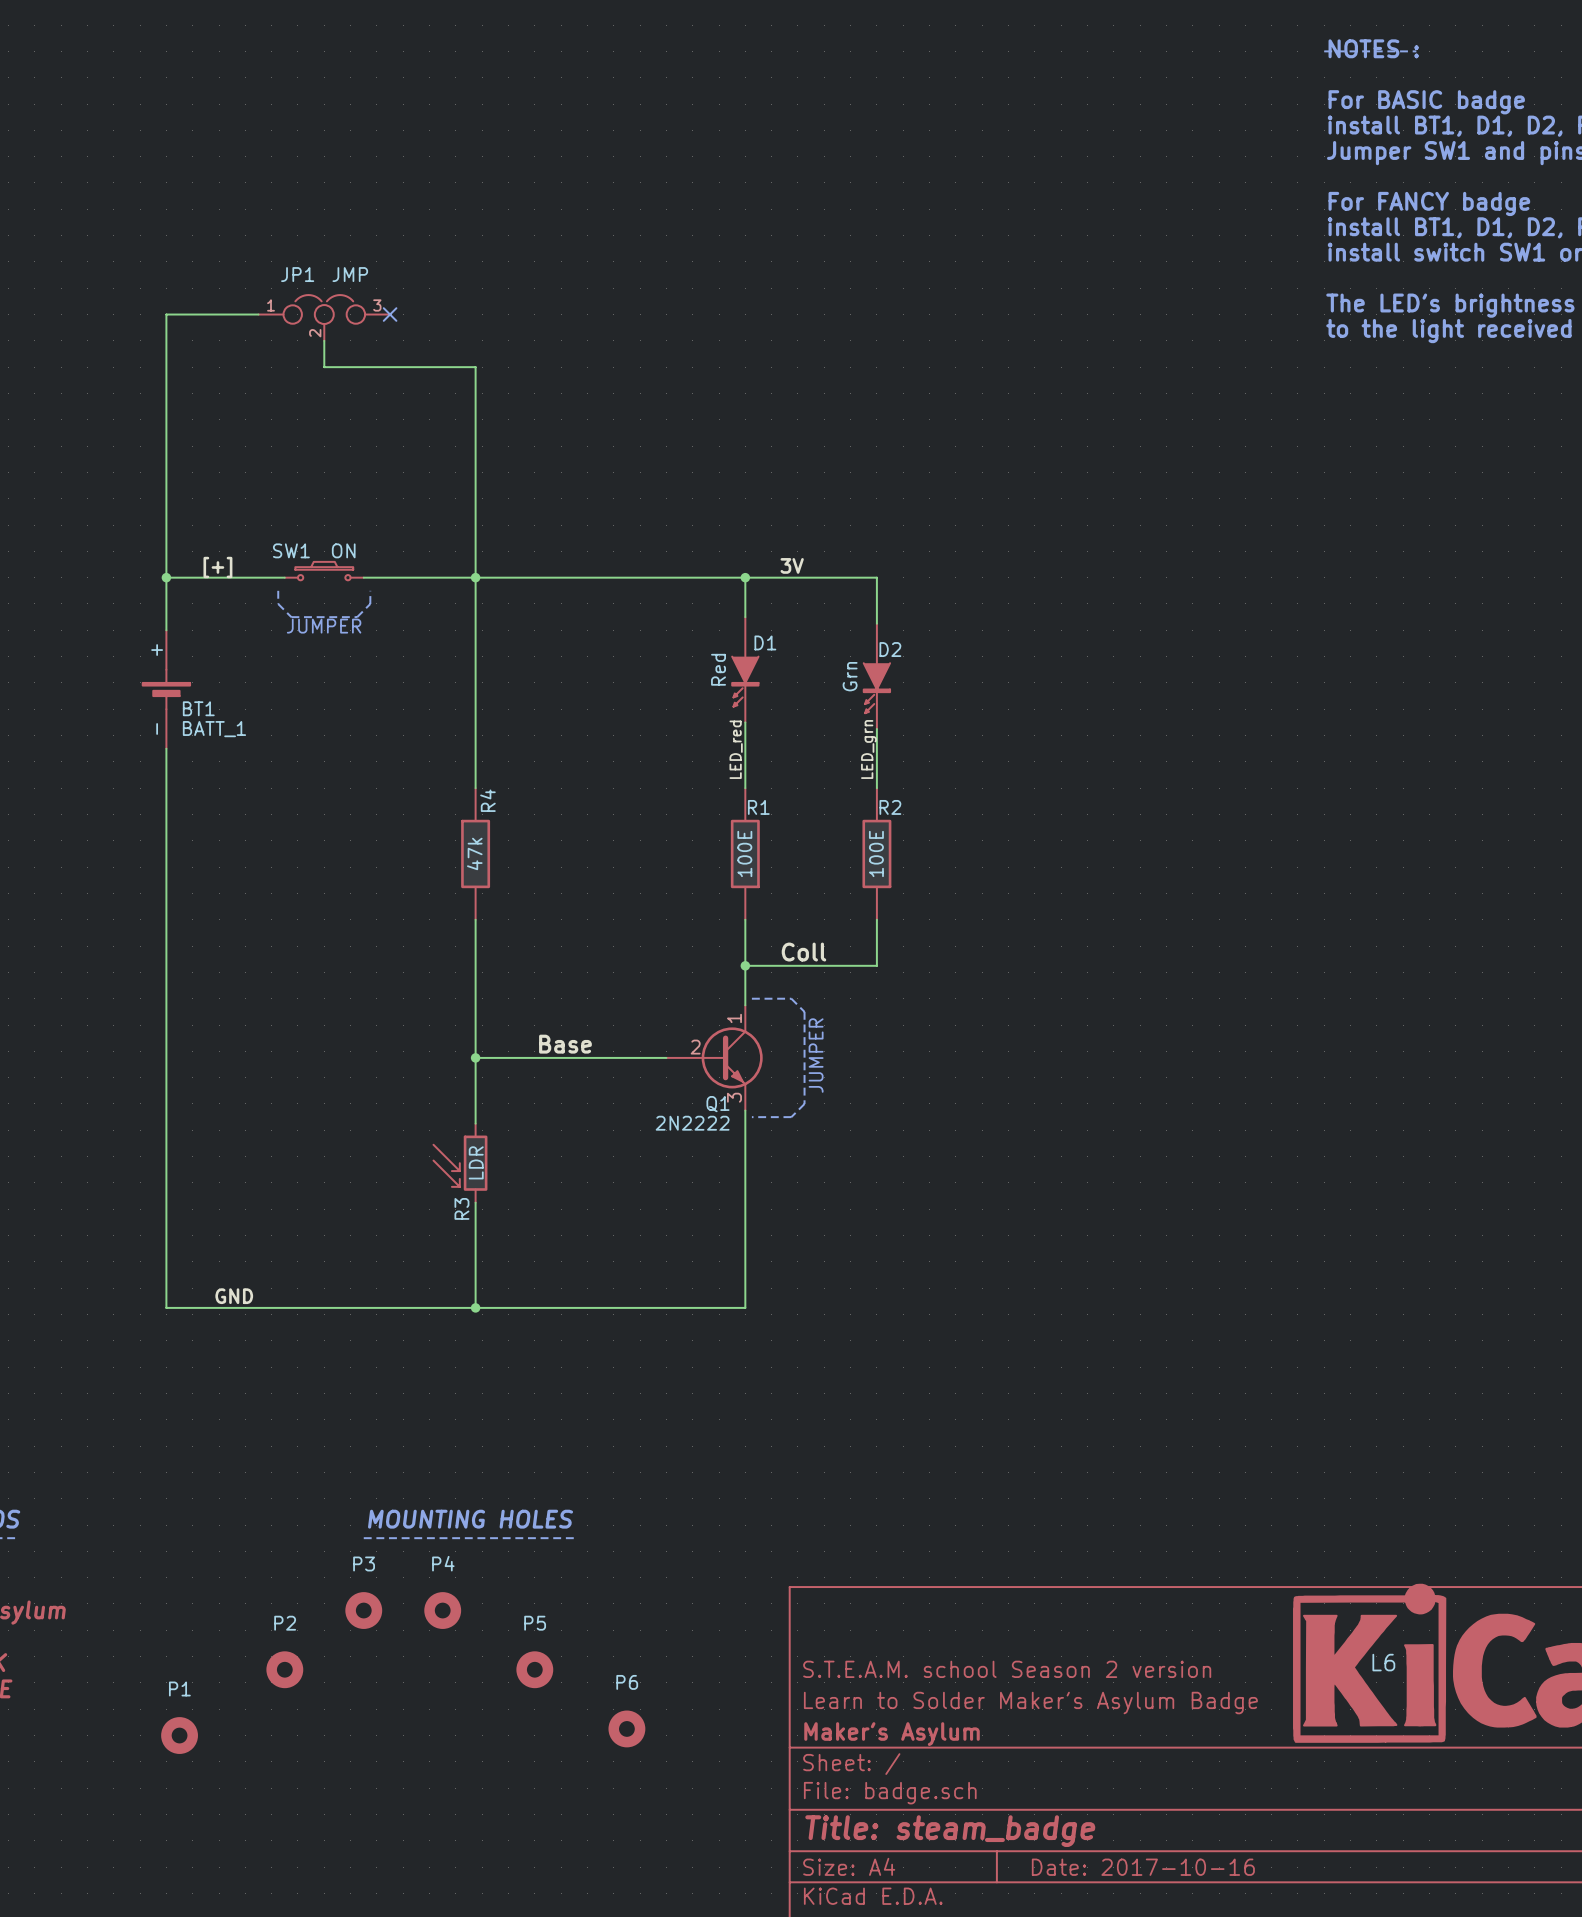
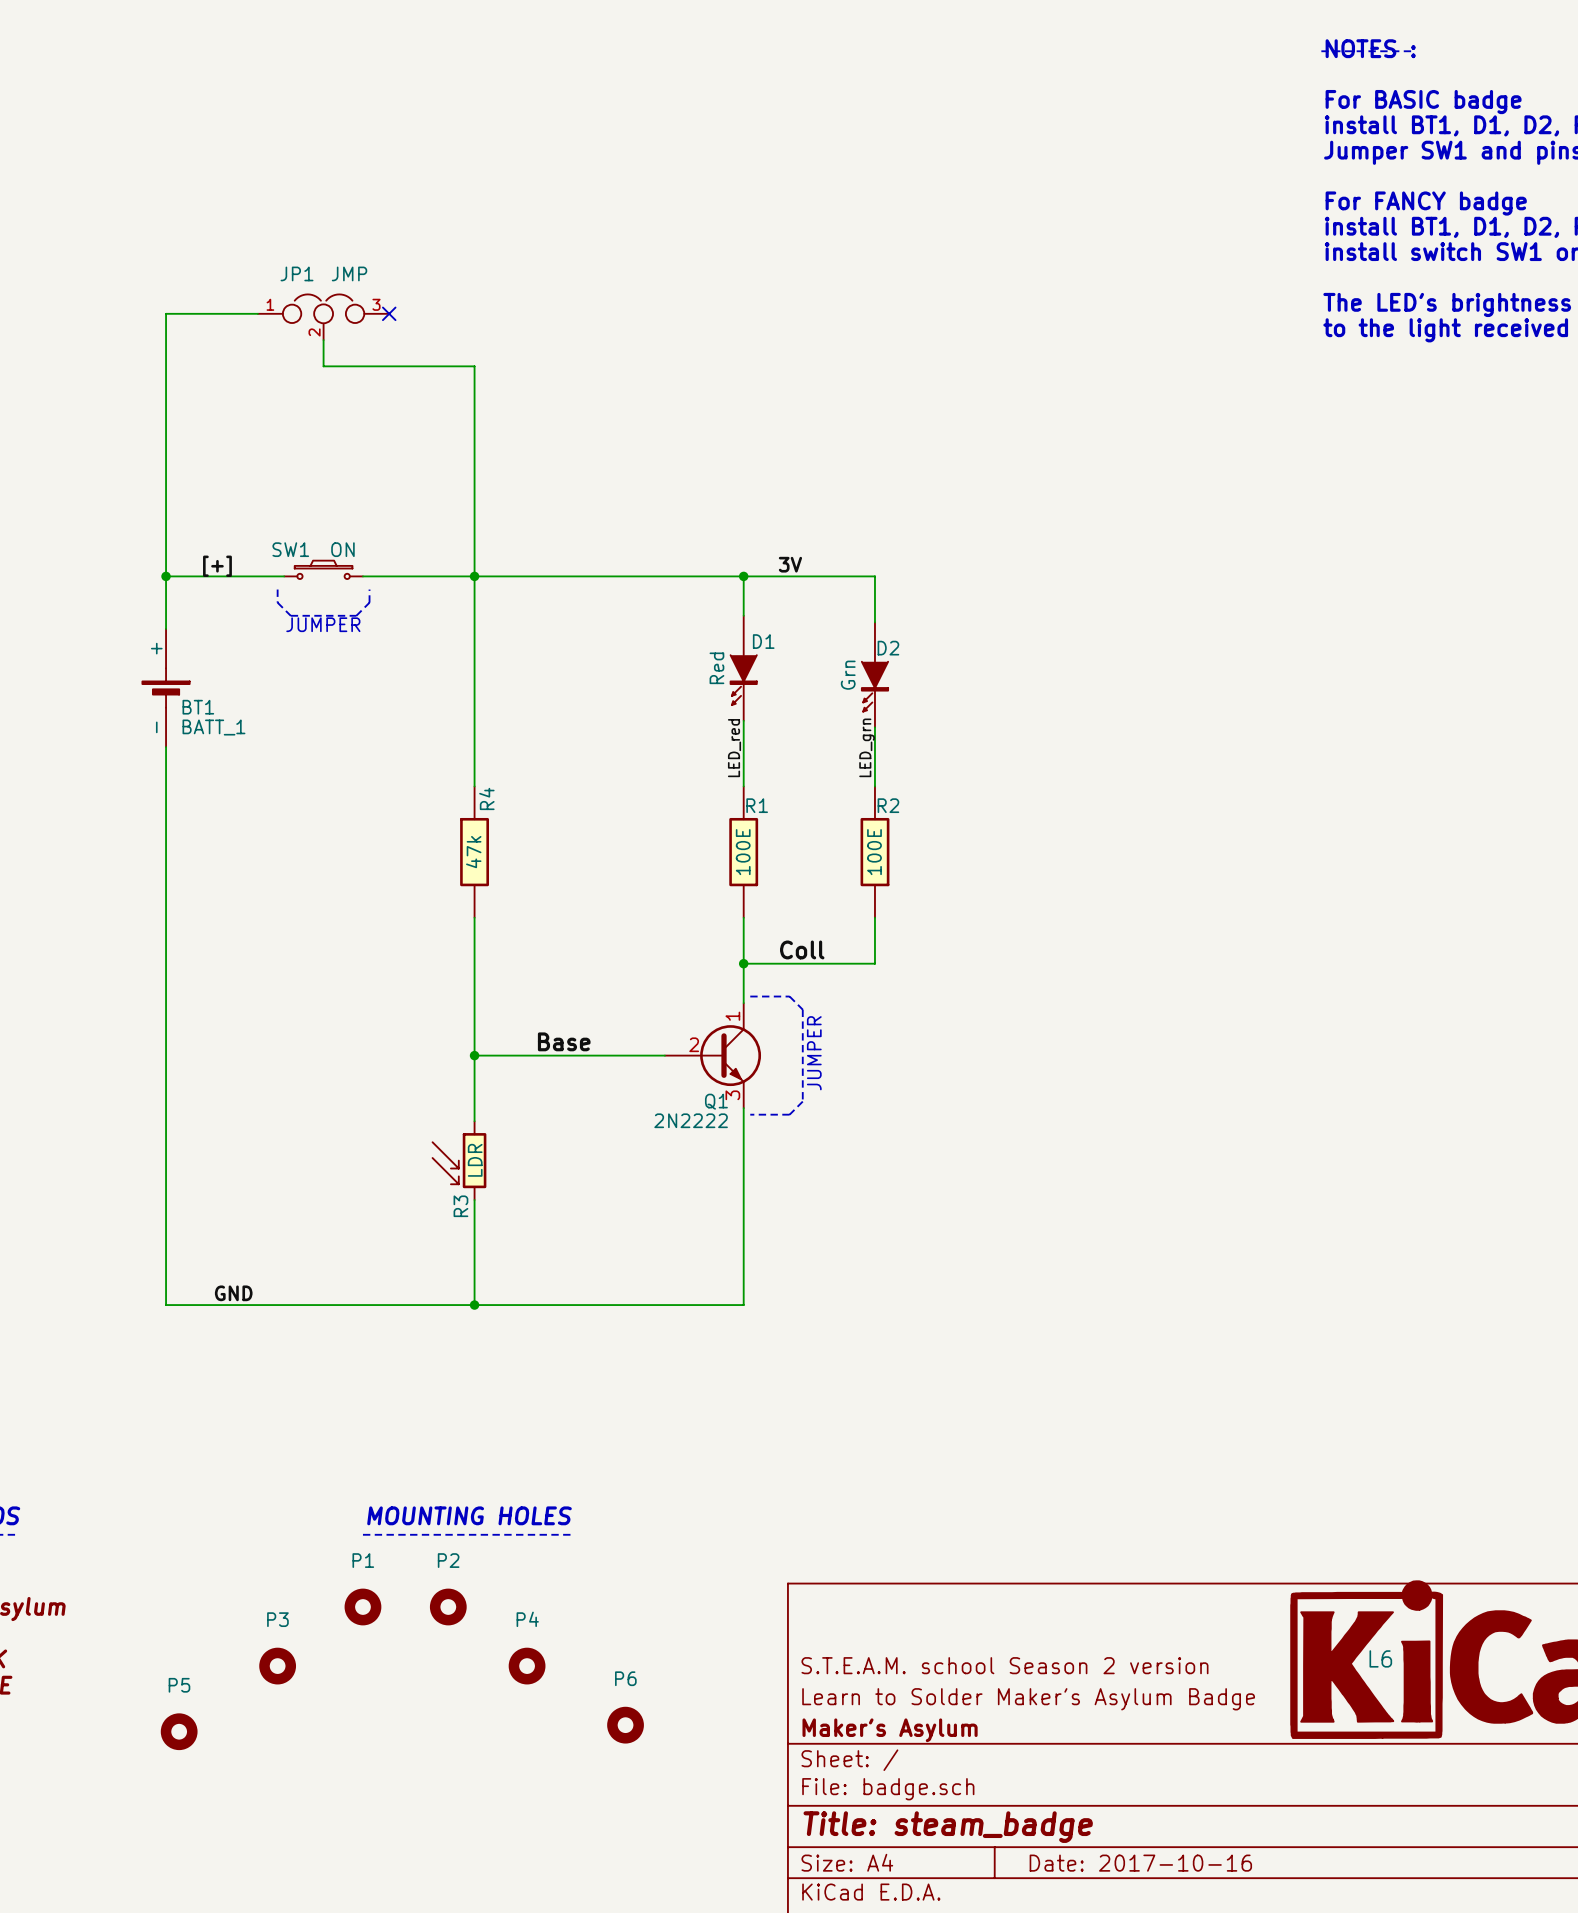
P3 name: P3 (364, 1563) -> P1 (363, 1560)
P4 position: (442, 1610) -> (527, 1666)
P3: none -> (277, 1666)
P2 position: (284, 1669) -> (448, 1607)
P5: (534, 1669) -> none
P1 name: P1 (179, 1688) -> P5 (179, 1685)

